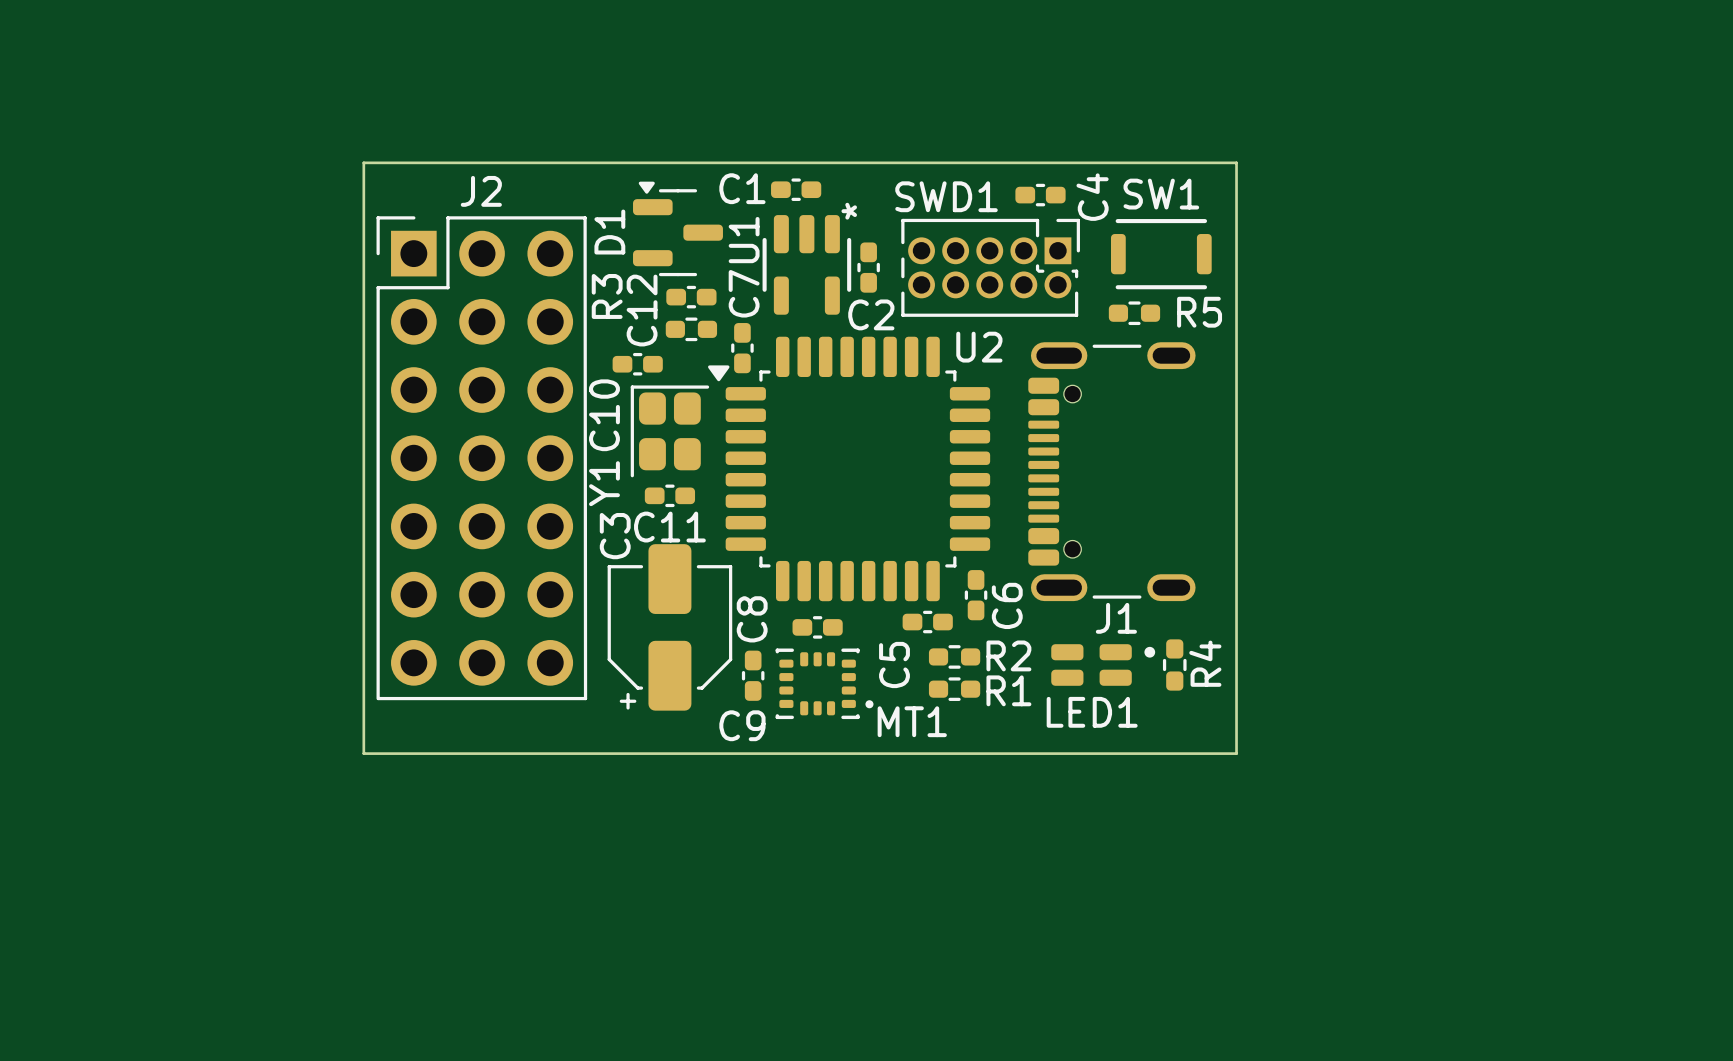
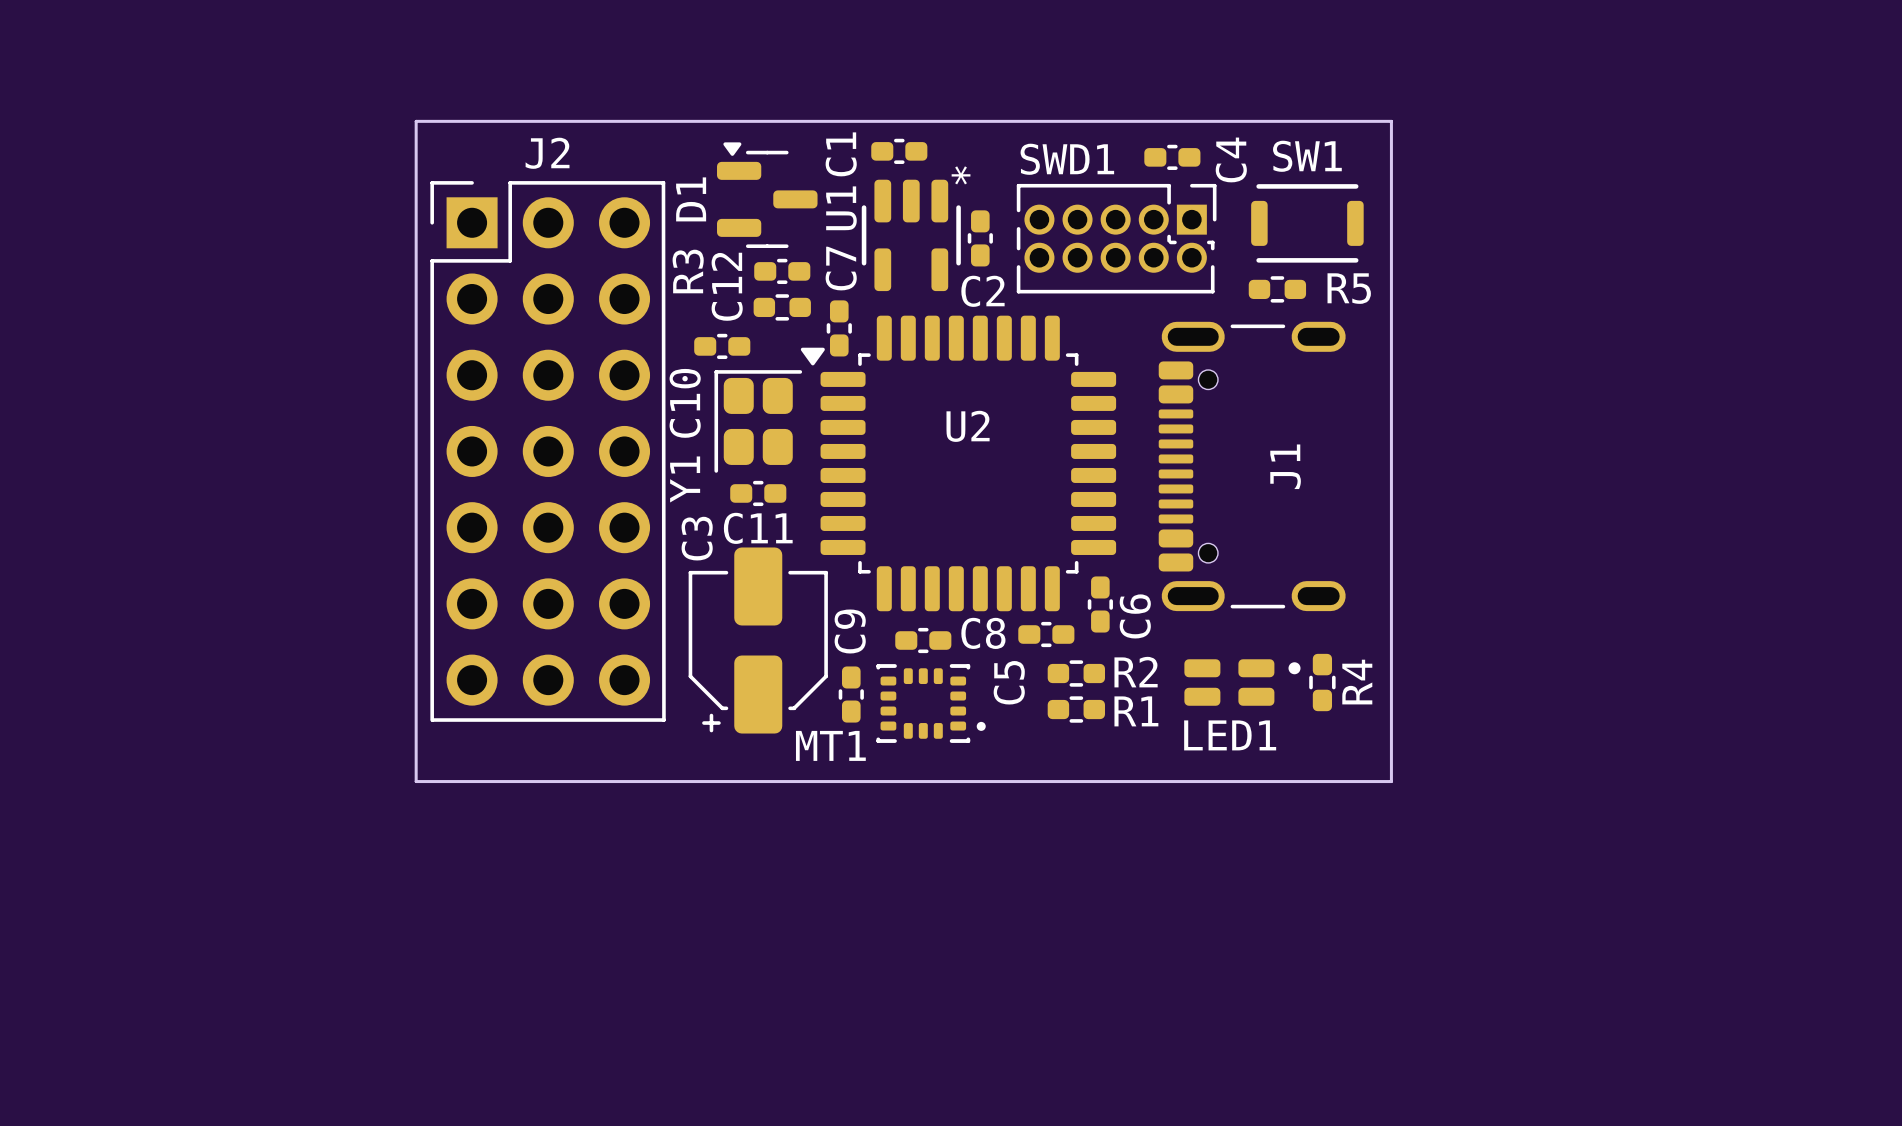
C1 name rotation: 0° (742, 188) -> 90° counterclockwise (841, 154)
U2 name position: U2 (979, 347) -> U2 (968, 426)
J1 name rotation: 0° (1116, 618) -> 90° counterclockwise (1285, 466)
J1 name position: J1 (1116, 618) -> J1 (1285, 466)
C8 name rotation: 0° (752, 619) -> 90° clockwise (983, 633)
C8 name position: C8 (752, 619) -> C8 (983, 633)
MT1 name position: MT1 (912, 721) -> MT1 (830, 745)
C9 name rotation: 0° (742, 725) -> 90° counterclockwise (850, 631)
C9 name position: C9 (742, 725) -> C9 (850, 631)

